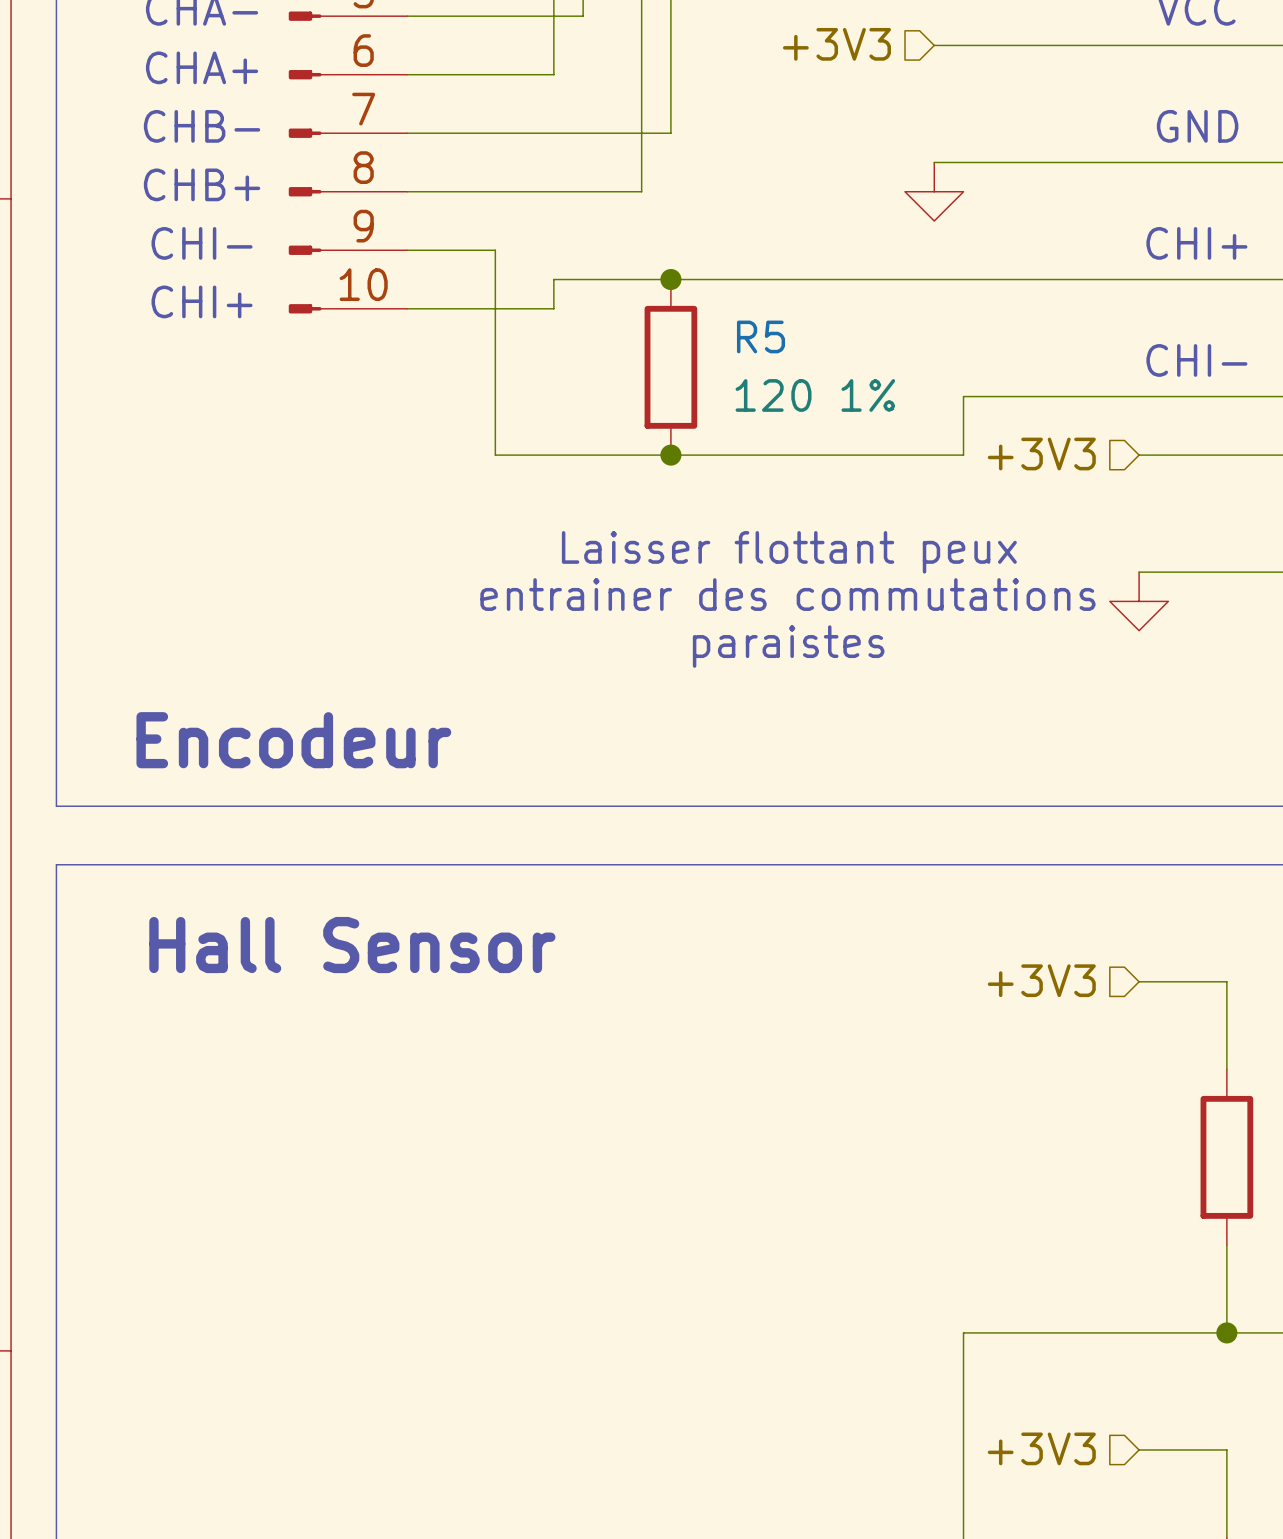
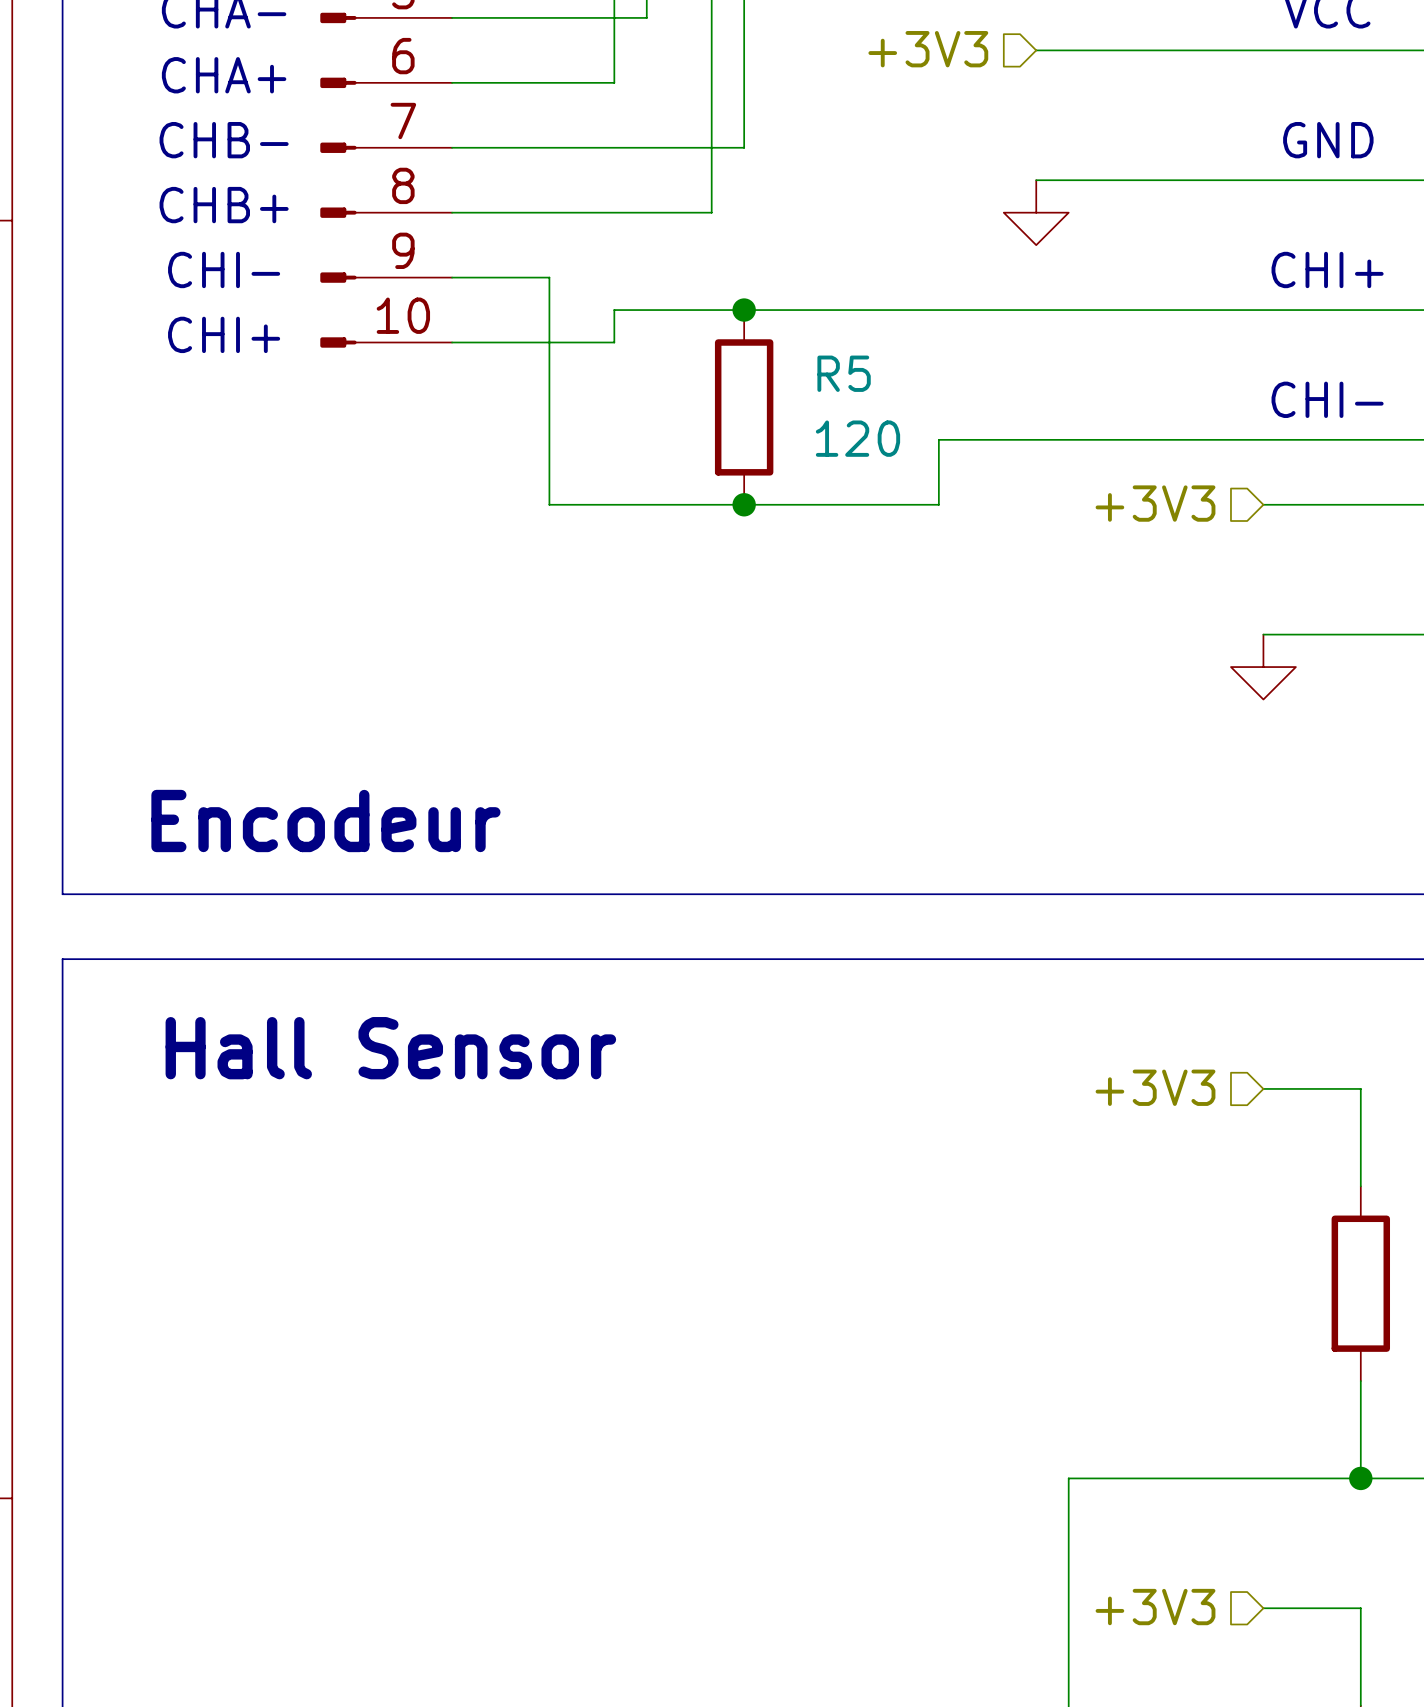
R5 value: 120 1% (815, 395) -> 120 (857, 438)
wire: (963, 396) (963, 455) (846, 455) -> (1068, 439) (938, 439) (938, 504)
text: Laisser flottant peux (789, 552) -> none
text: entrainer des commutations (787, 594) -> none
text: paraistes (788, 646) -> none

